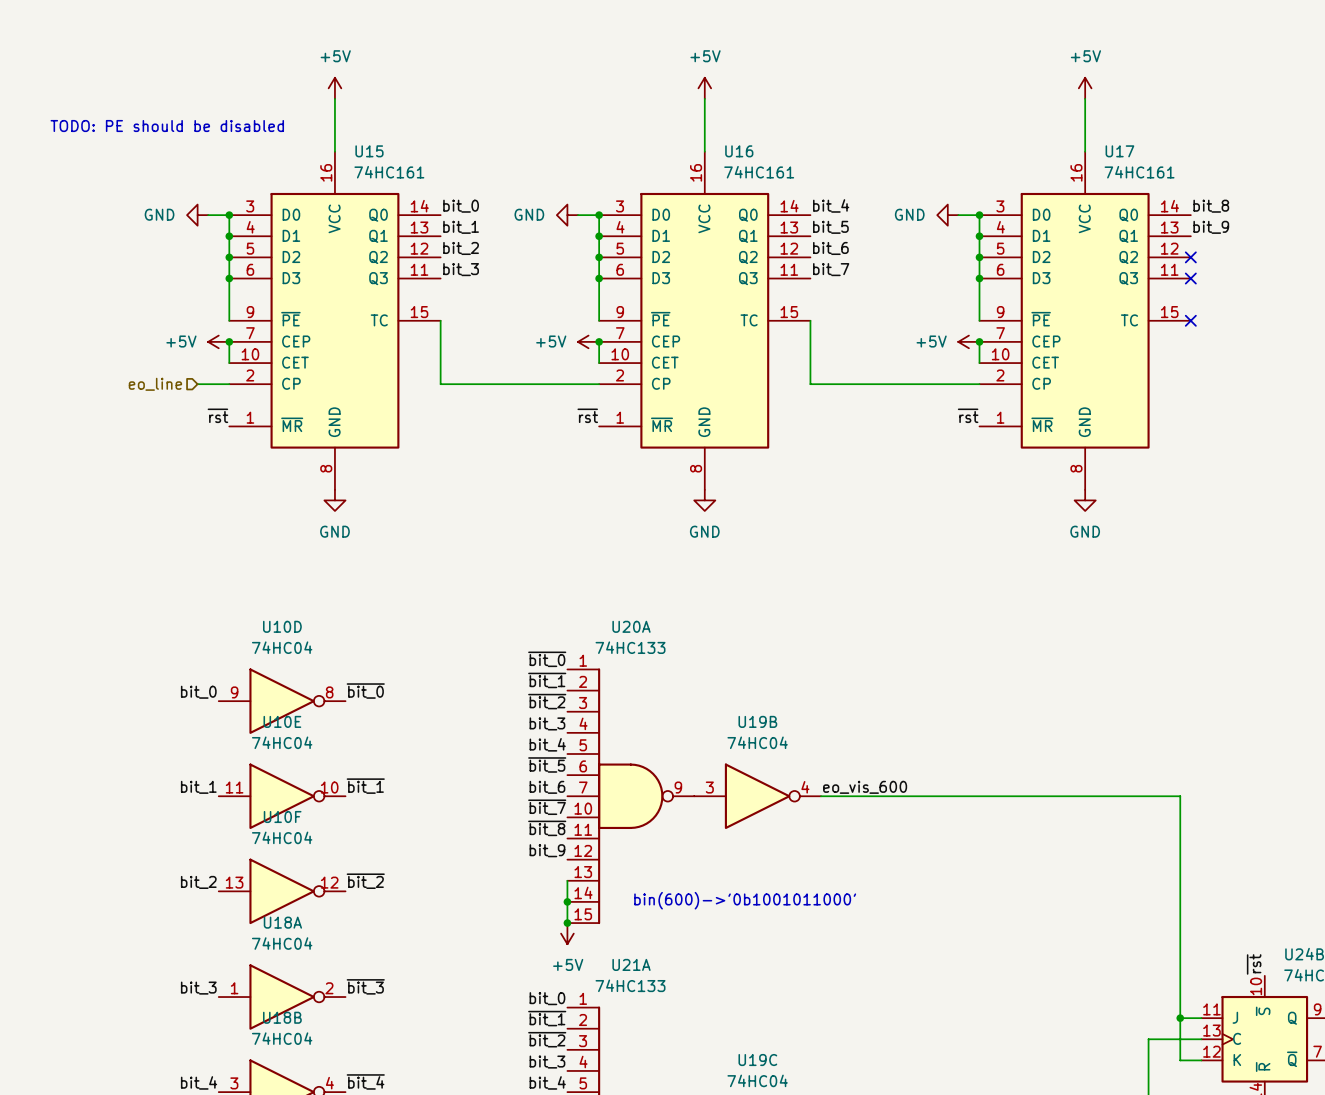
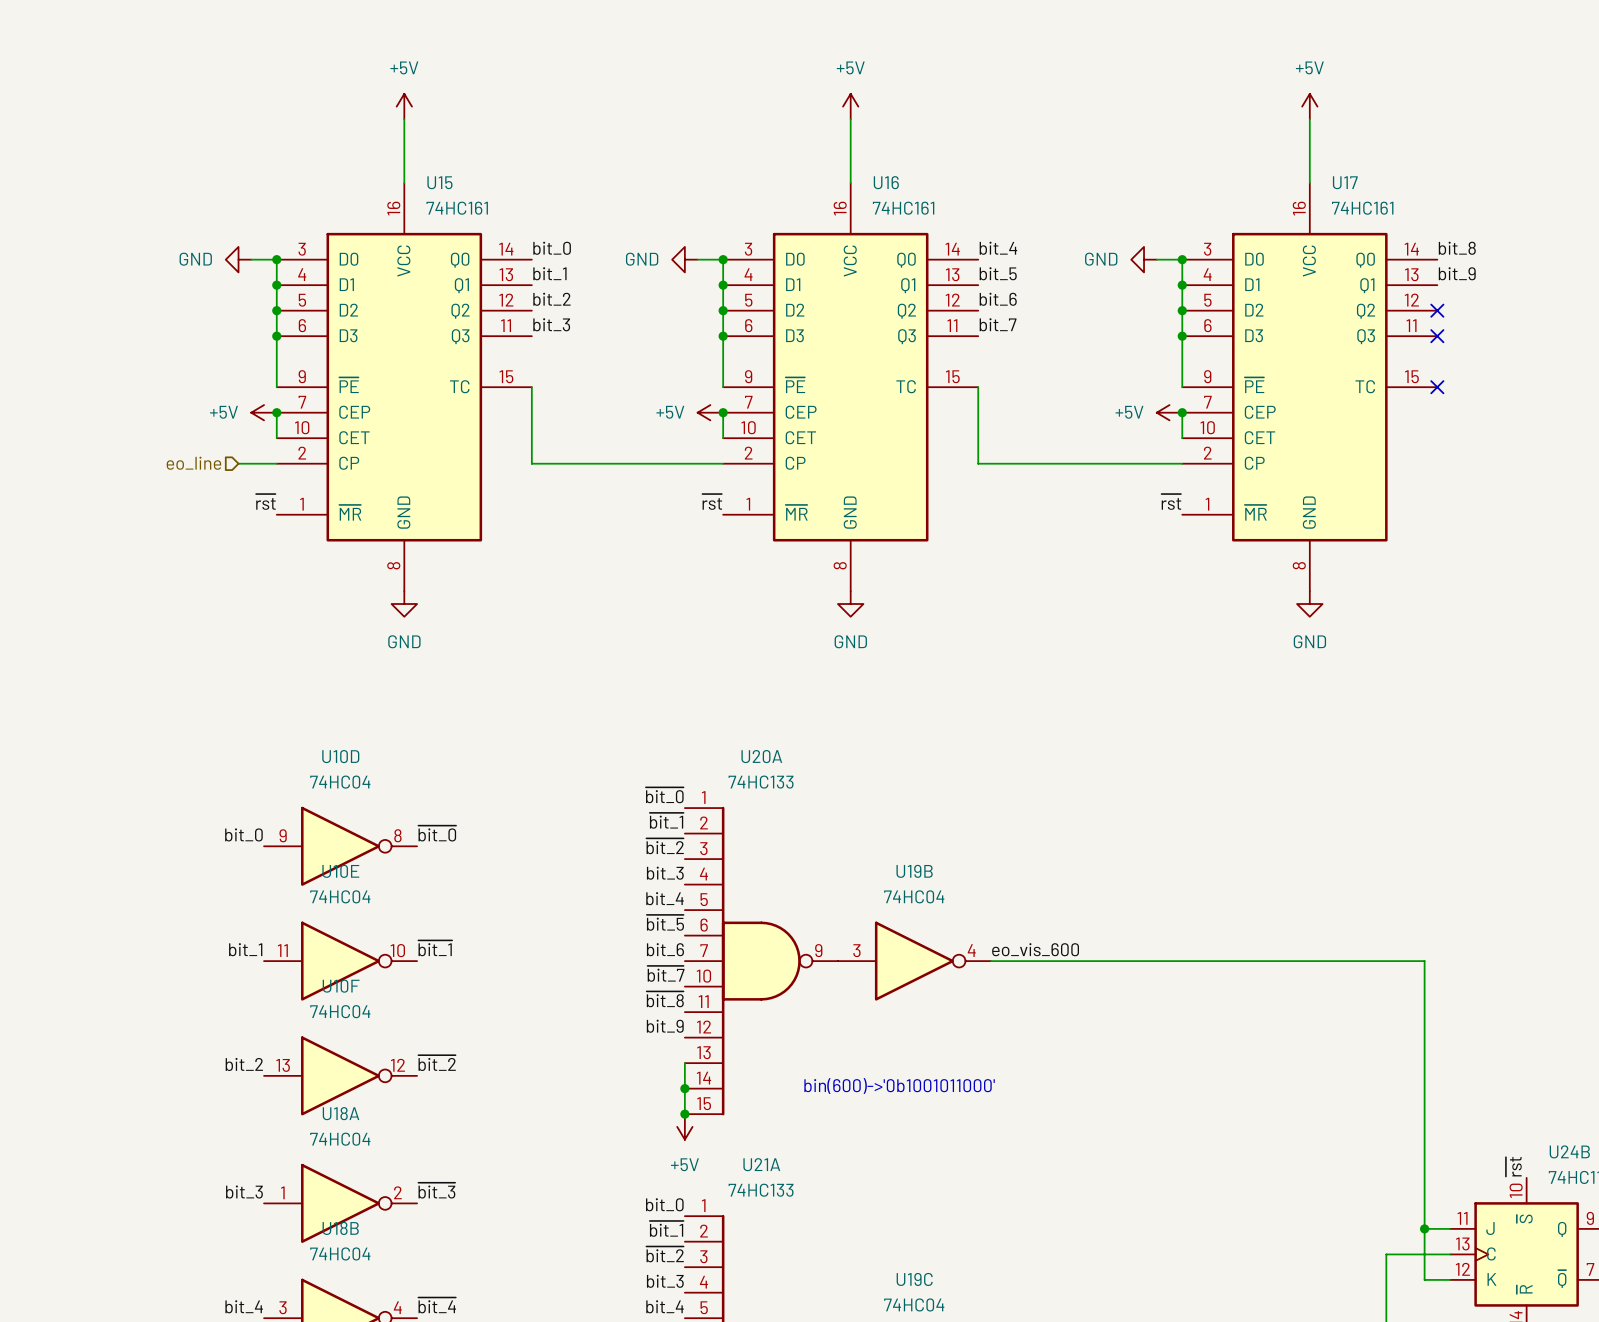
text: TODO: PE should be disabled (167, 126) -> none

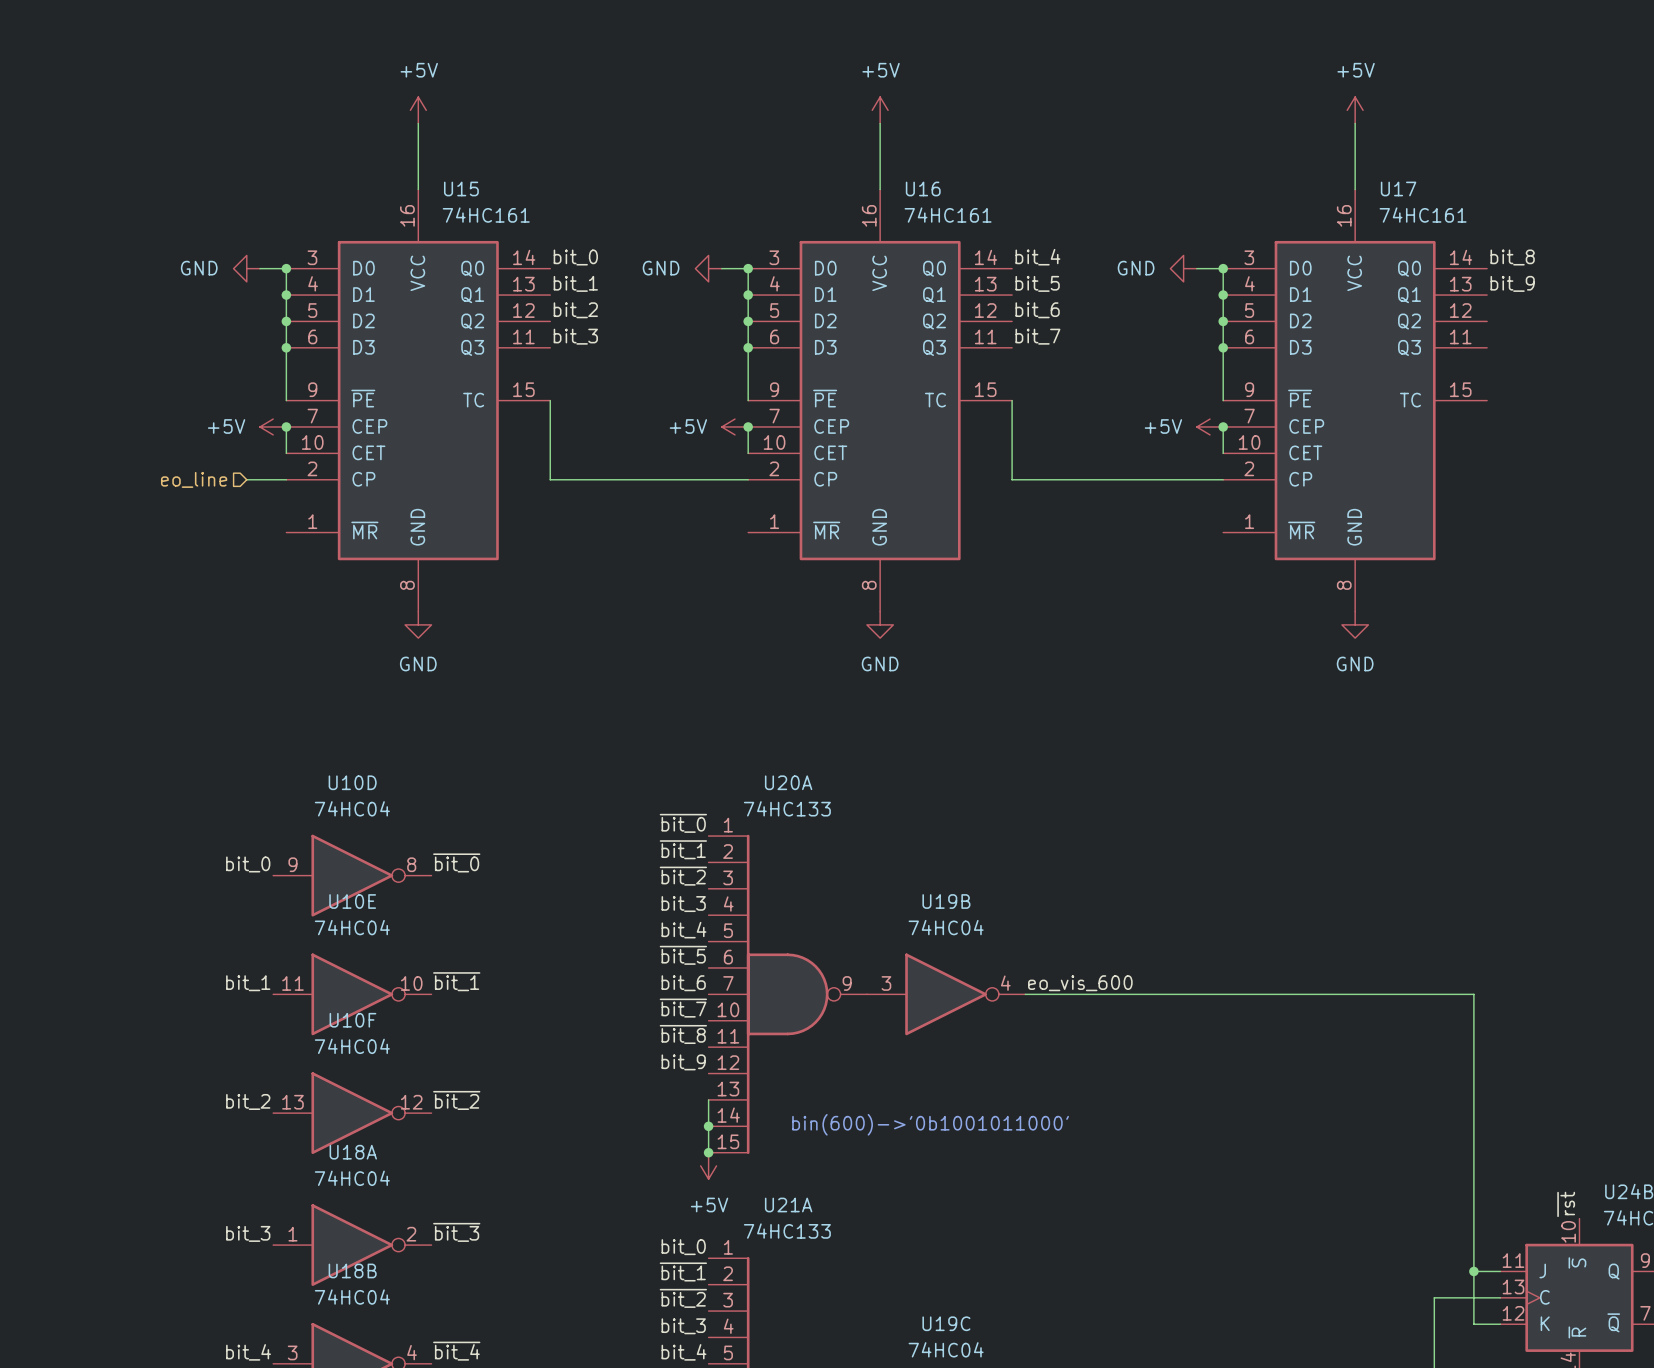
no-connect mark: (1437, 310) -> none
no-connect mark: (1437, 336) -> none
no-connect mark: (1437, 387) -> none
label: ~{rst} (265, 501) -> none
label: ~{rst} (712, 501) -> none
label: ~{rst} (1171, 501) -> none

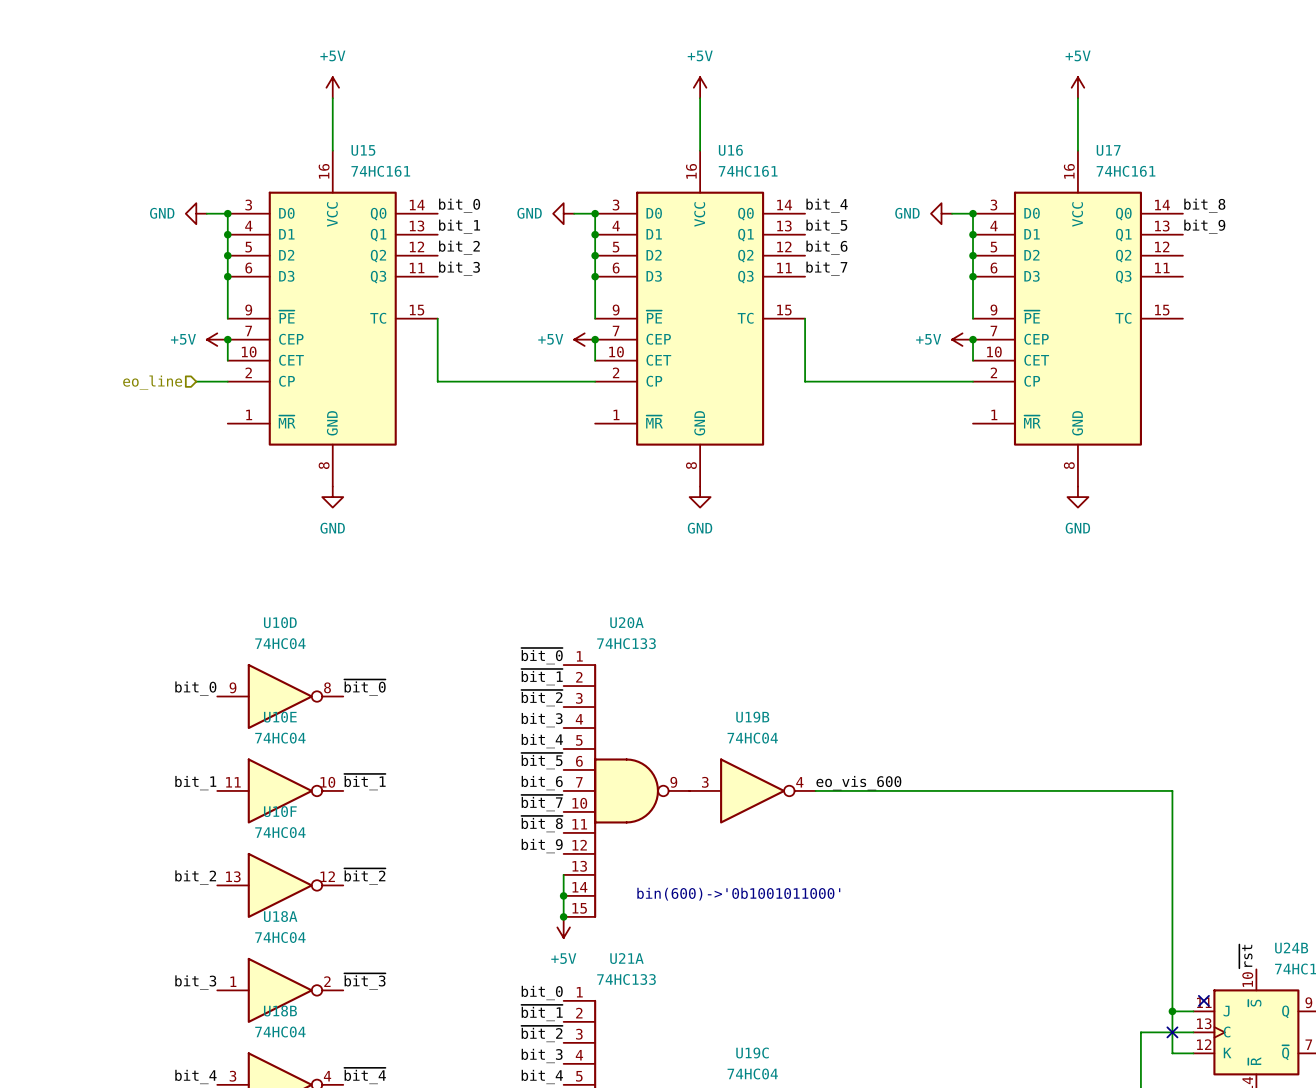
no-connect mark: none -> (1203, 1000)
no-connect mark: none -> (1172, 1032)

